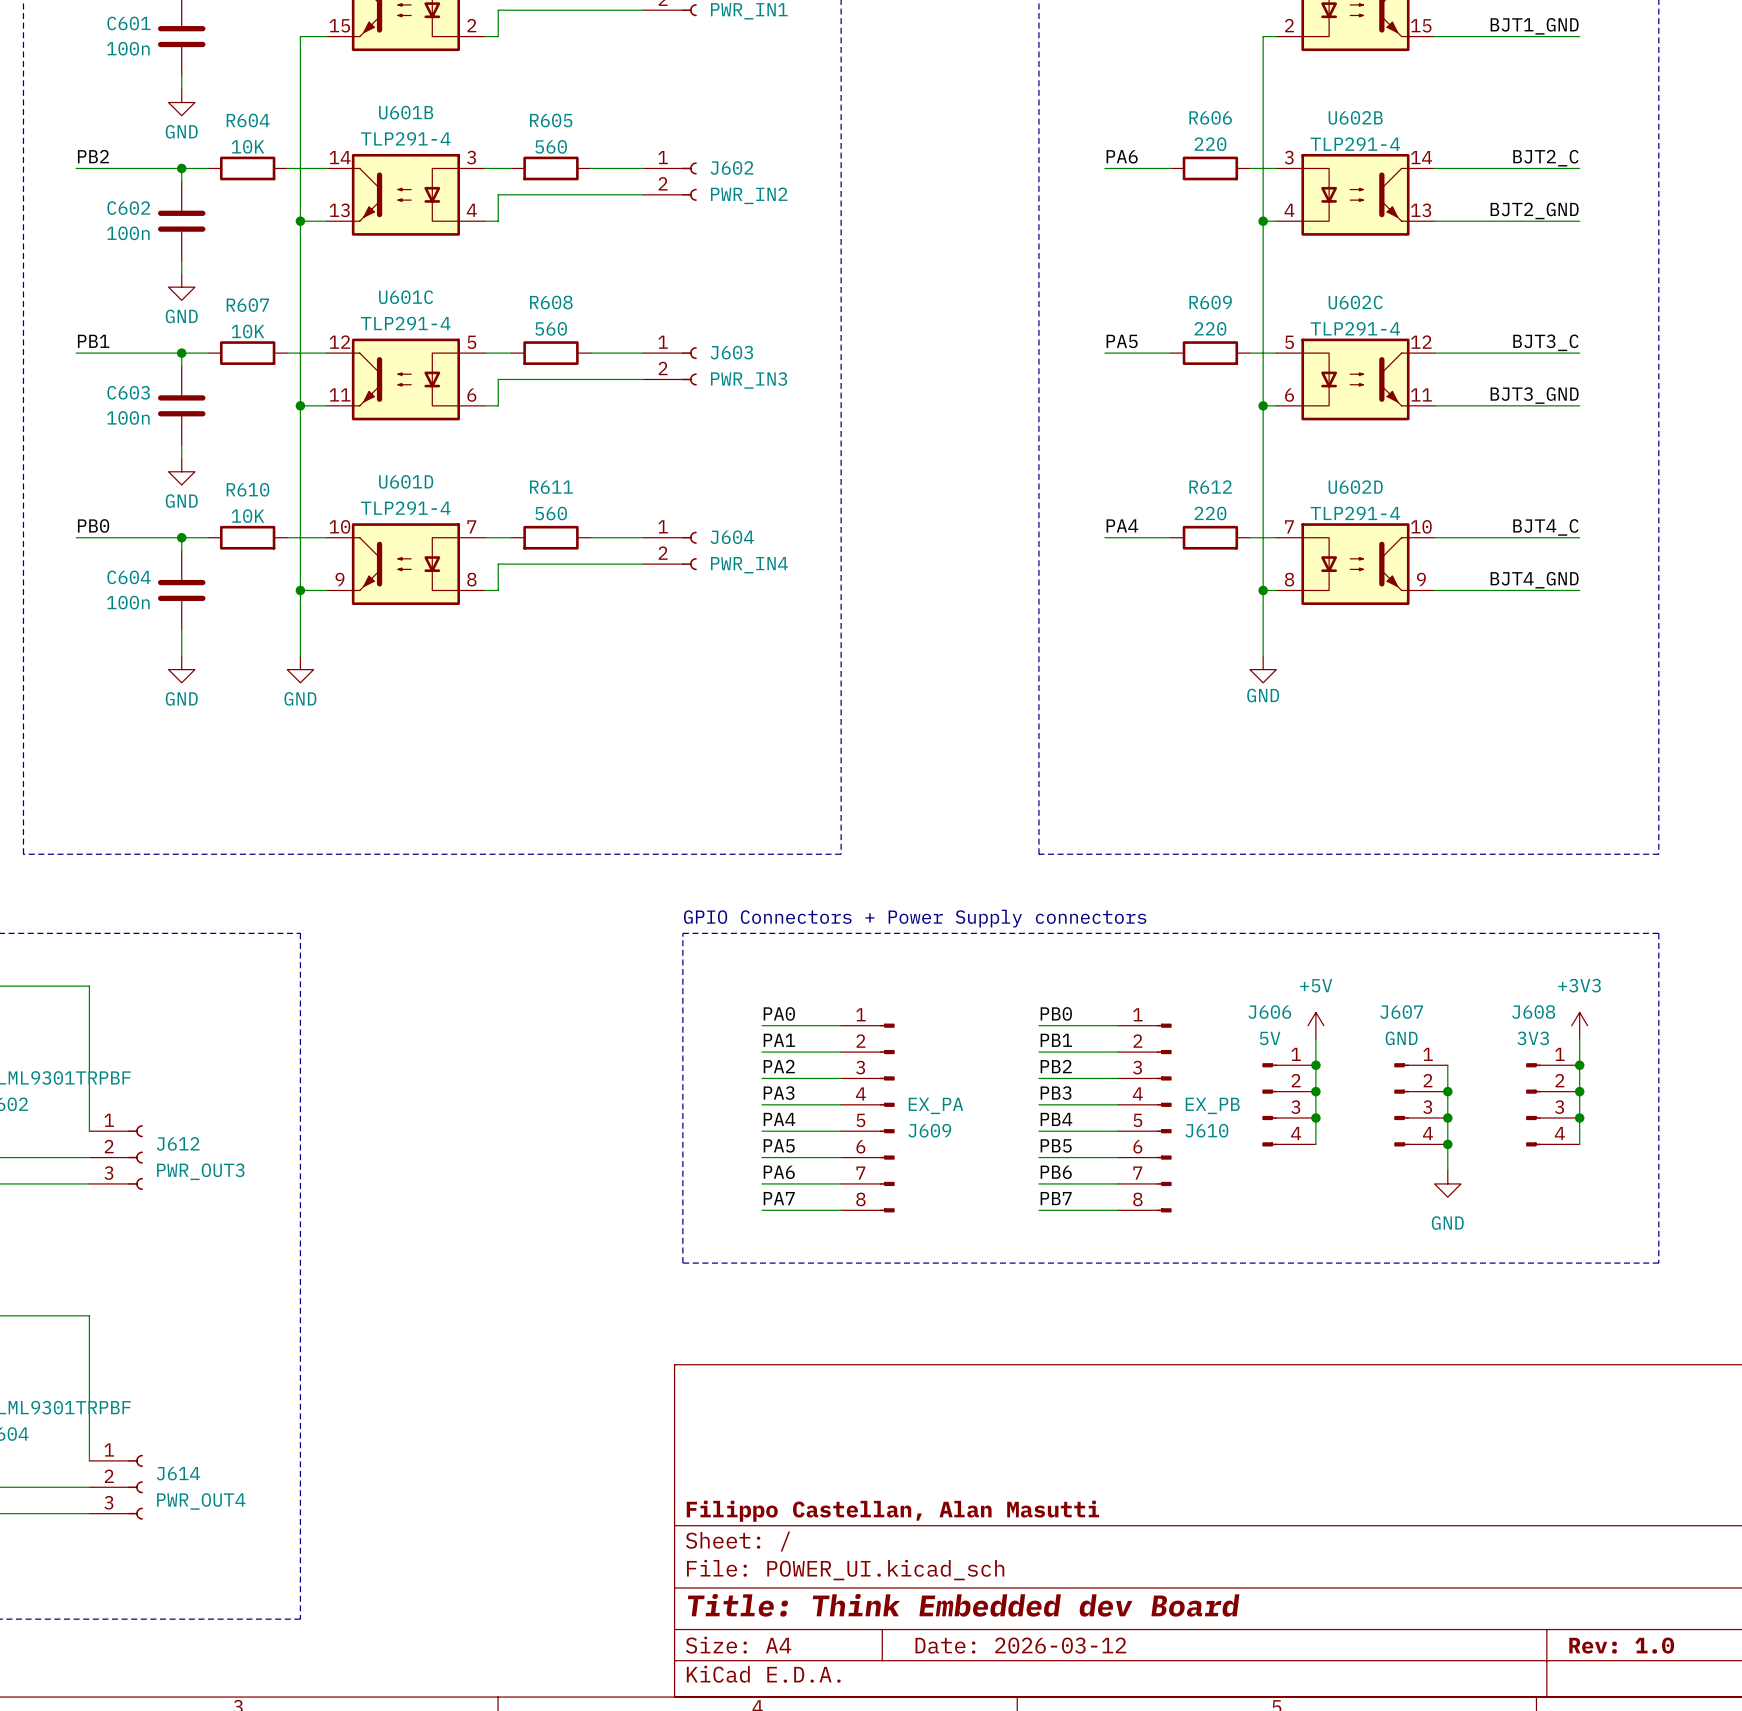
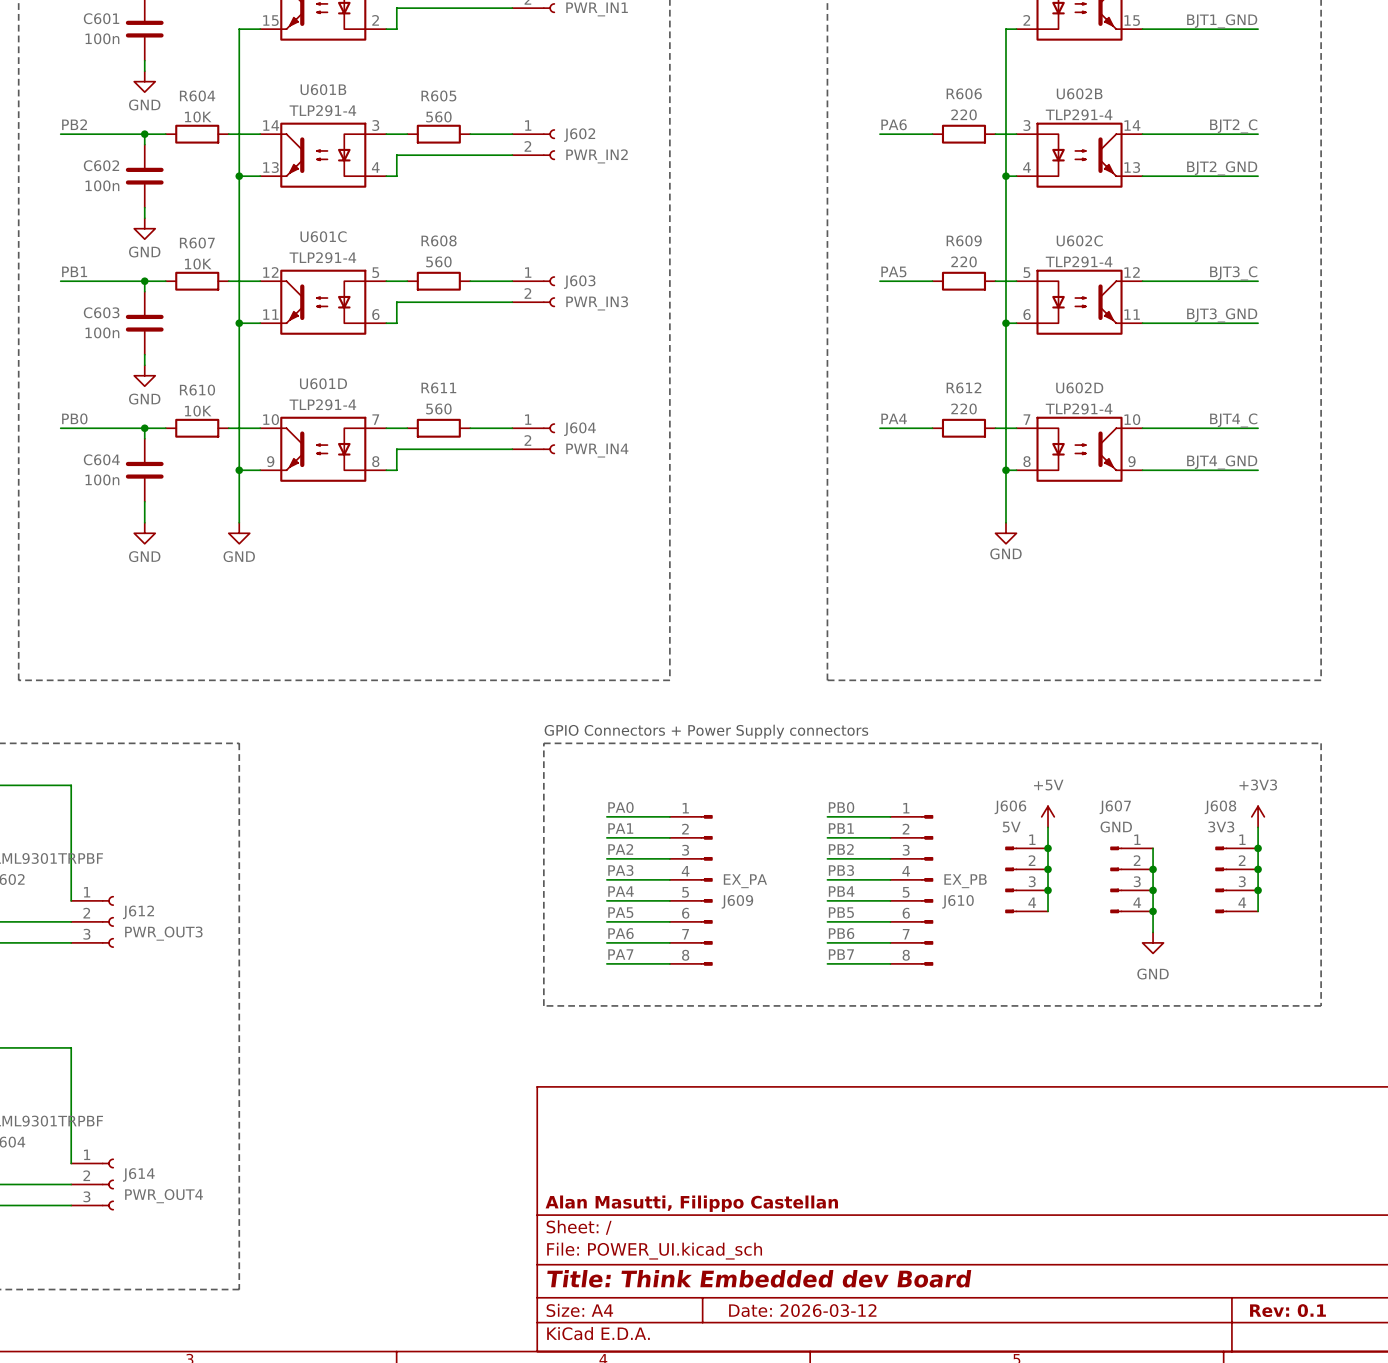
title block: Filippo Castellan, Alan Masutti (892, 1511) -> Alan Masutti, Filippo Castellan (691, 1203)
title block: Rev: 1.0 (1621, 1645) -> Rev: 0.1 (1287, 1310)

